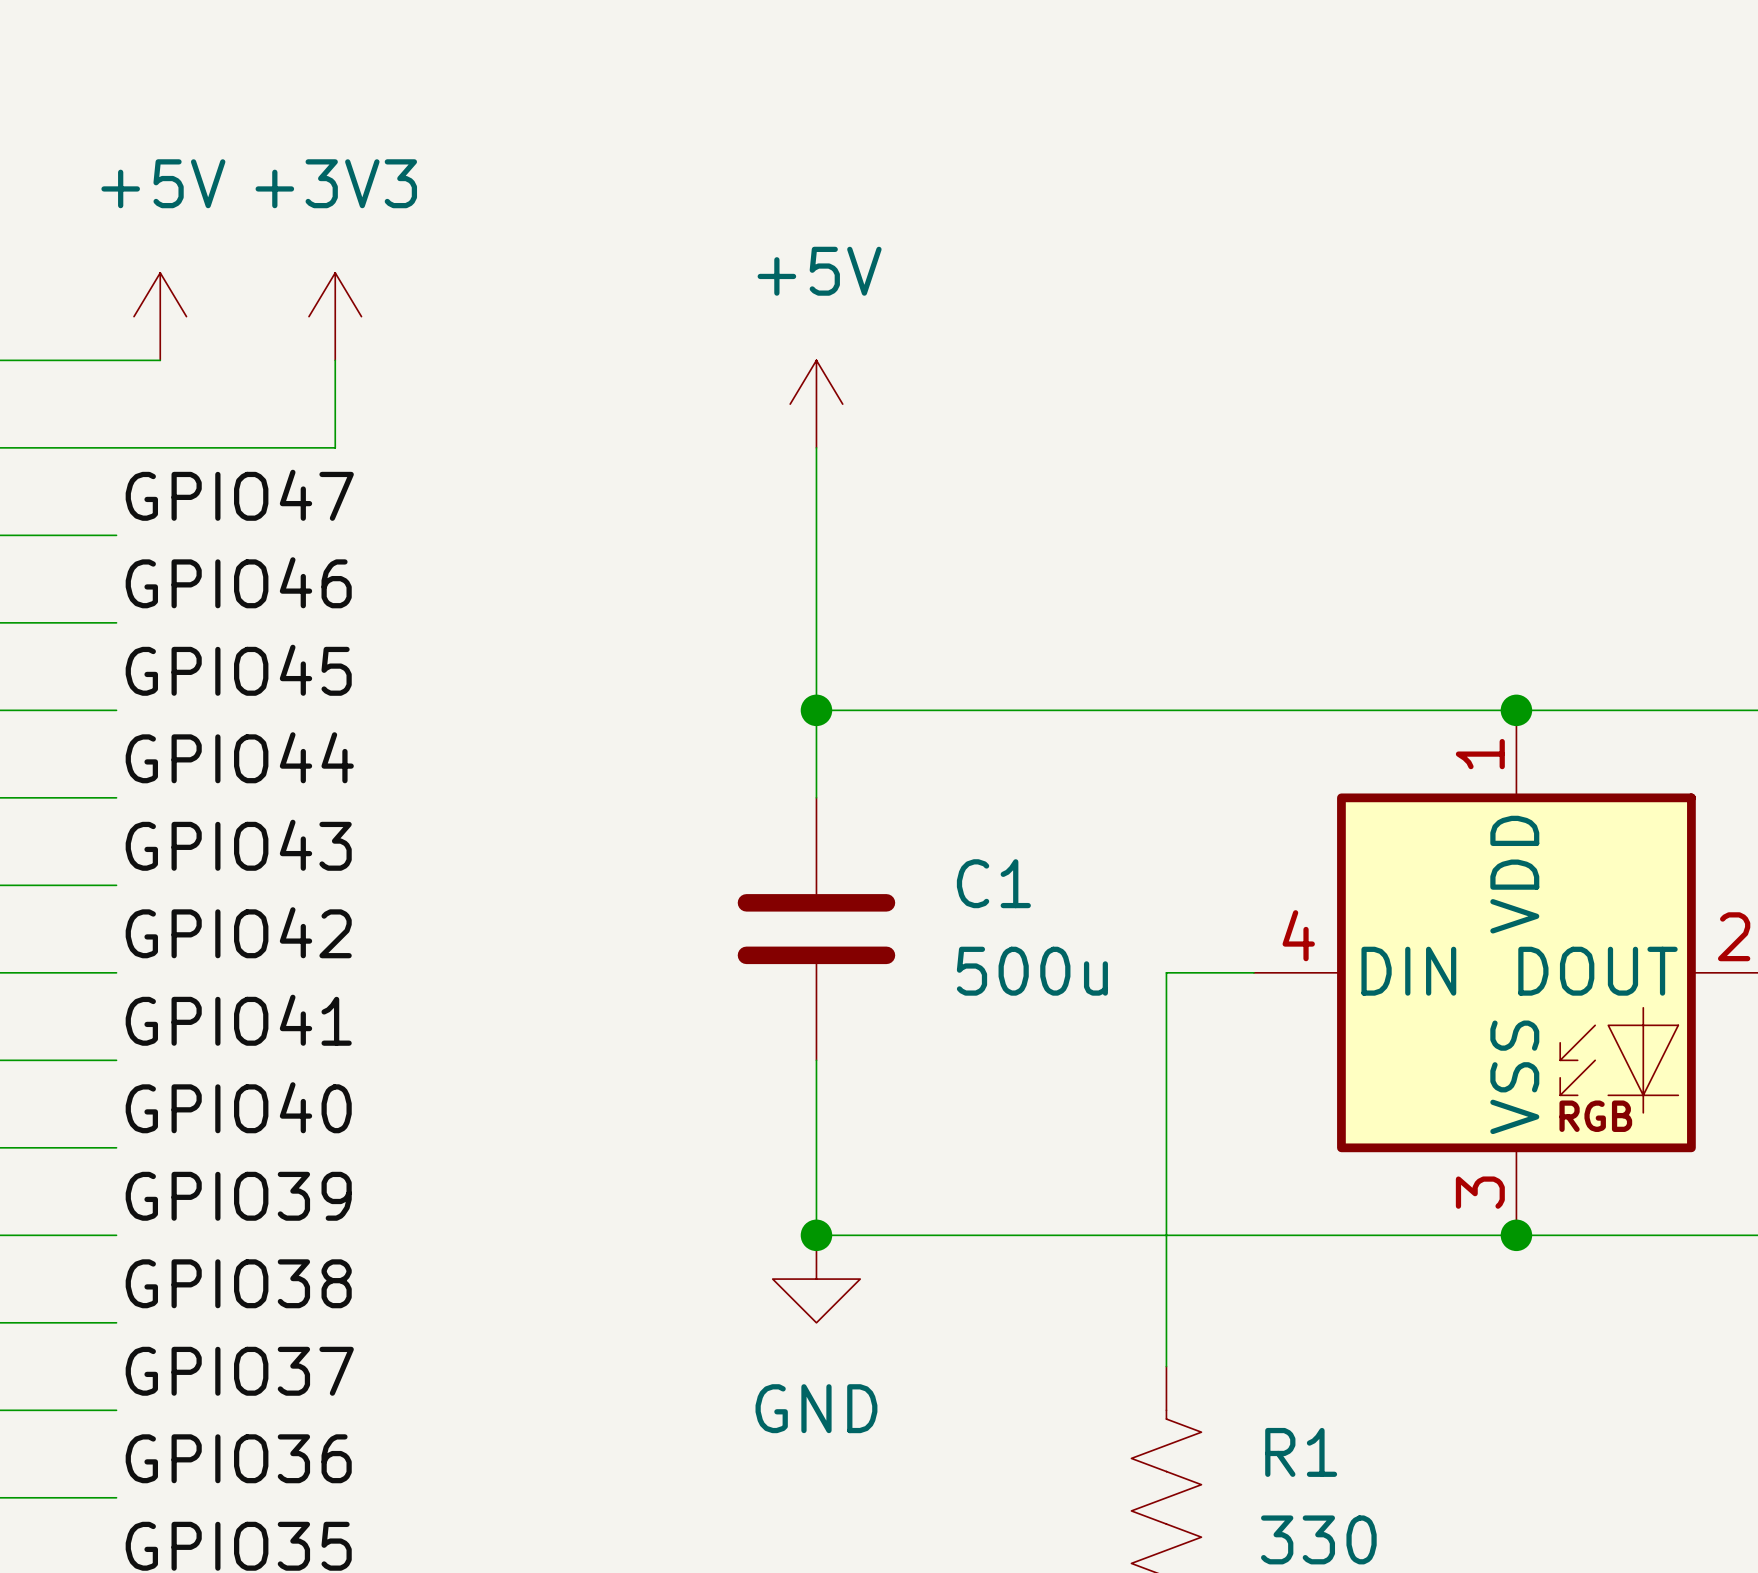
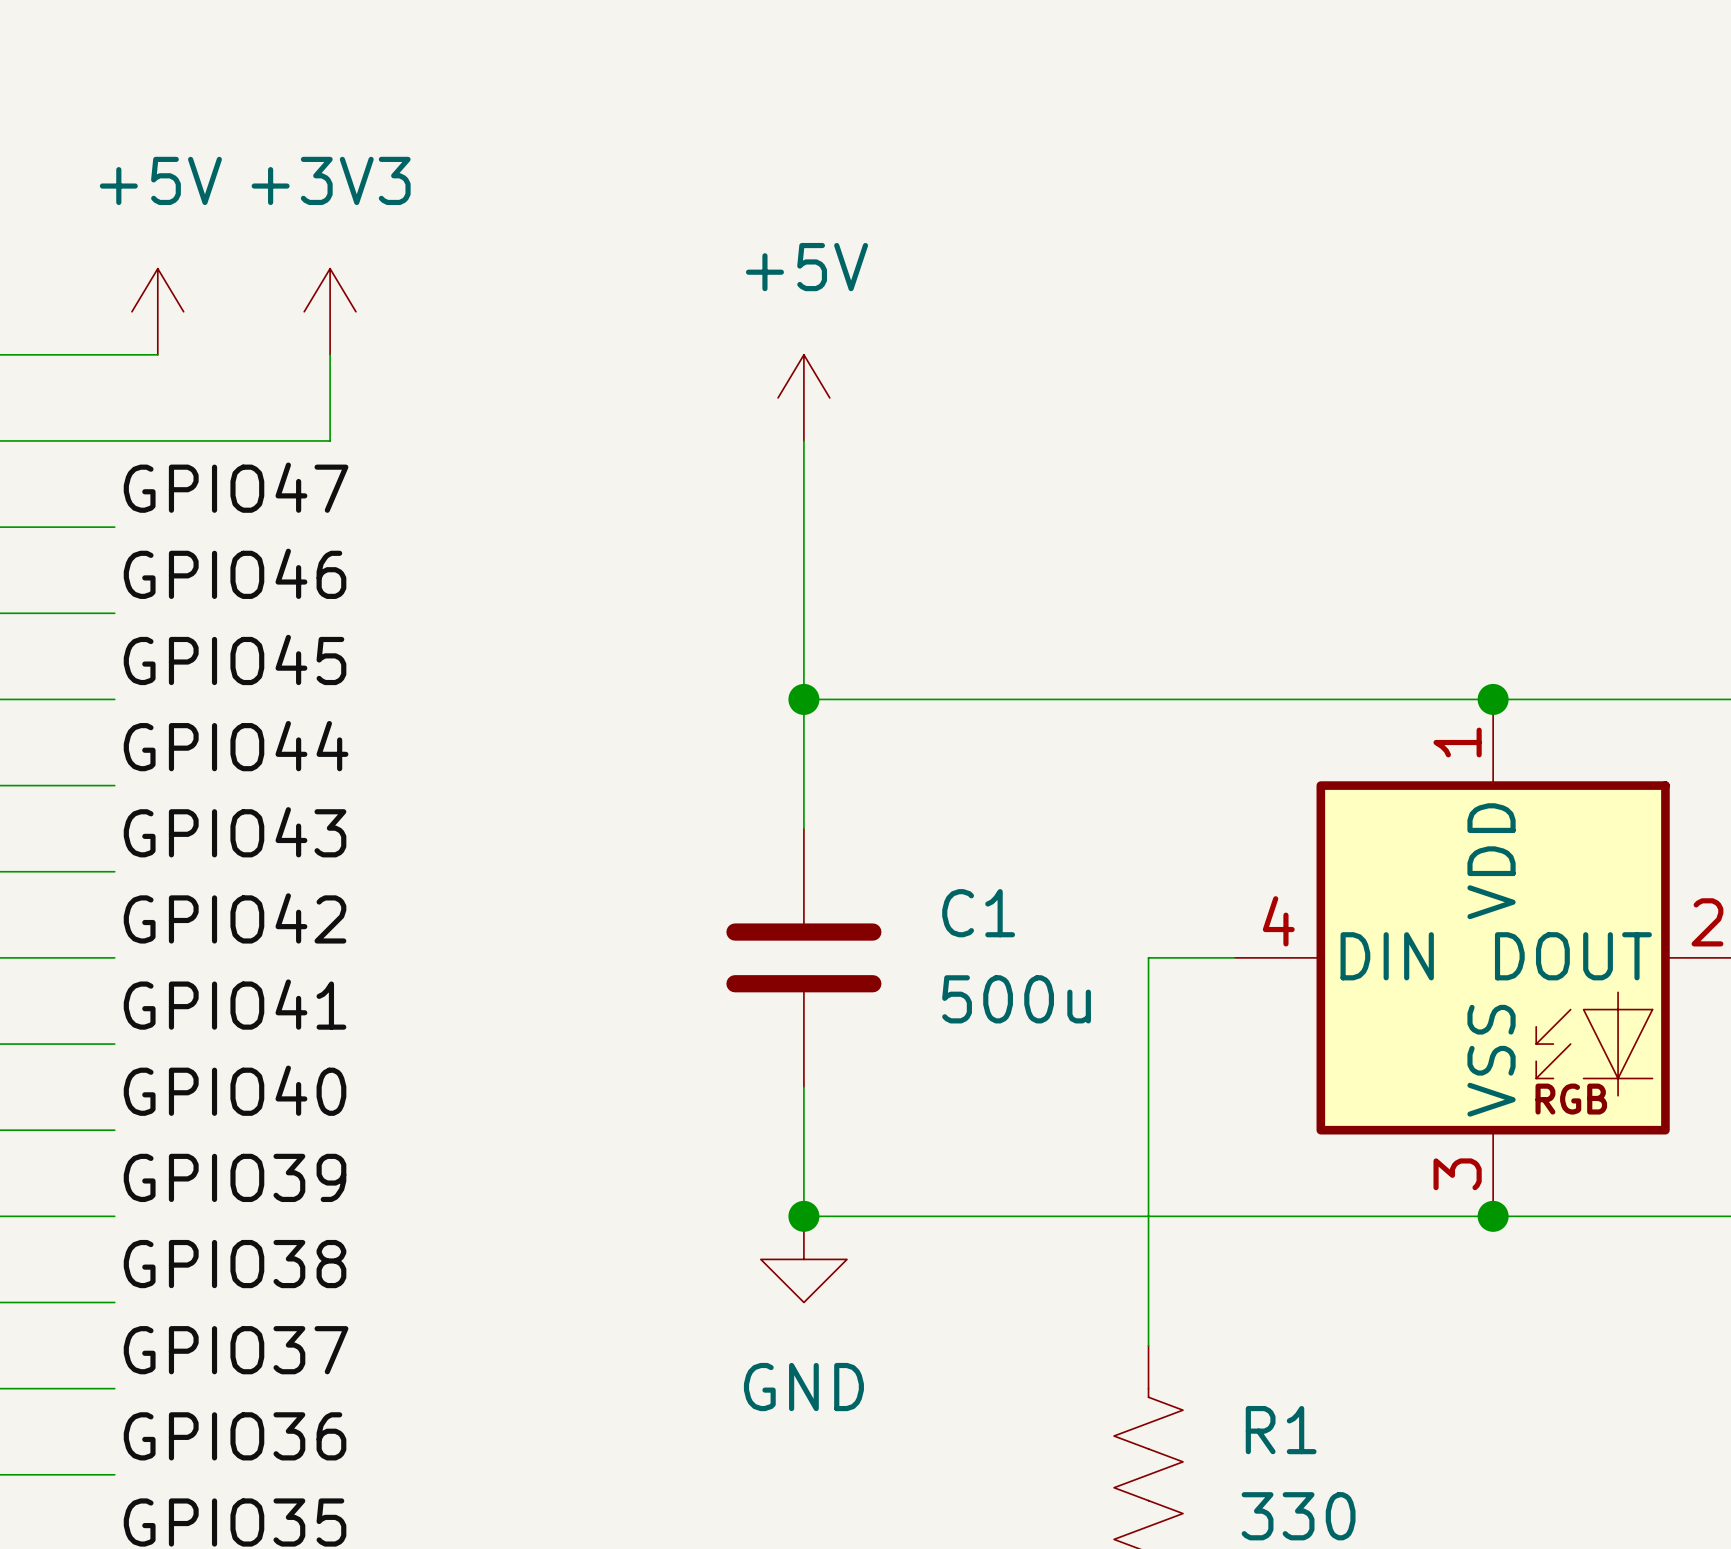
C1 position: (816, 929) -> (803, 957)

